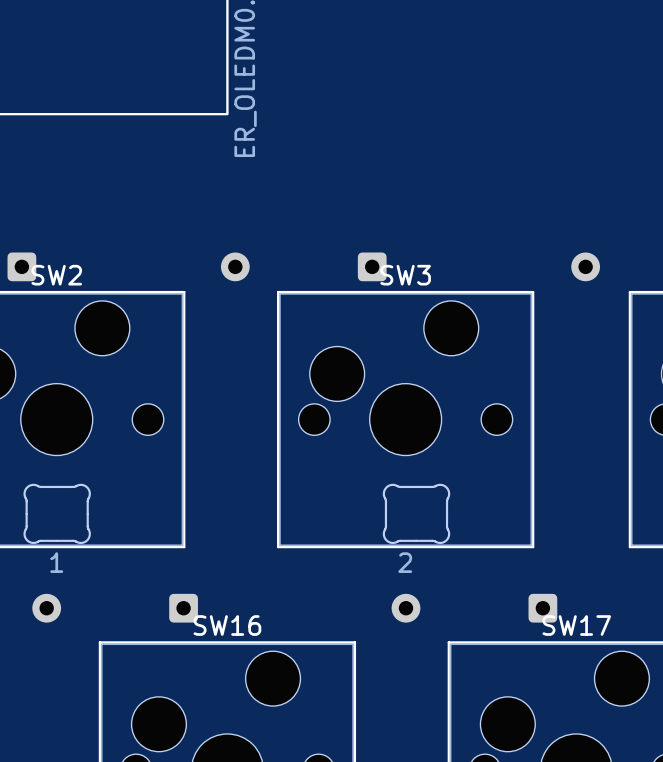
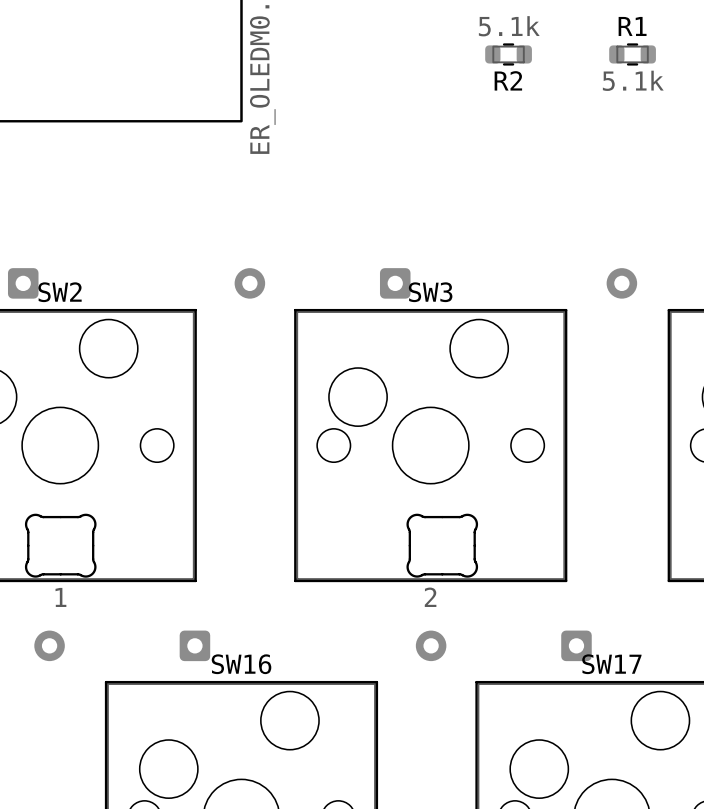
R2: none -> 5.1k (508, 54)
R1: none -> 5.1k (632, 54)

